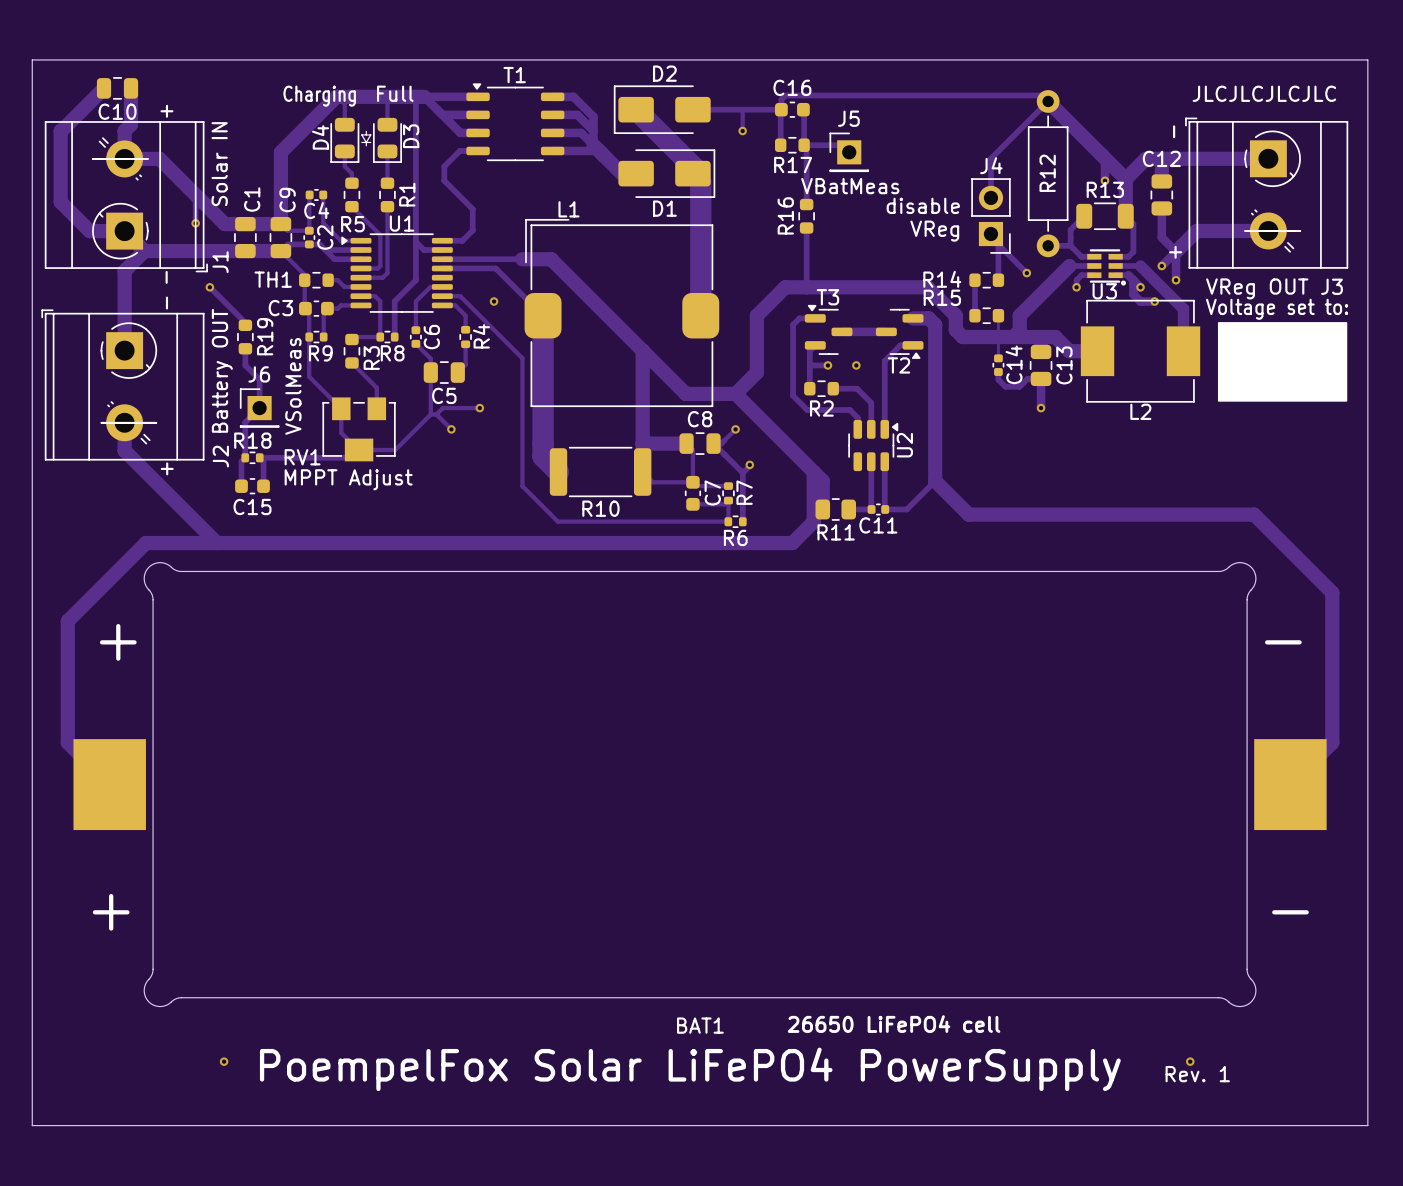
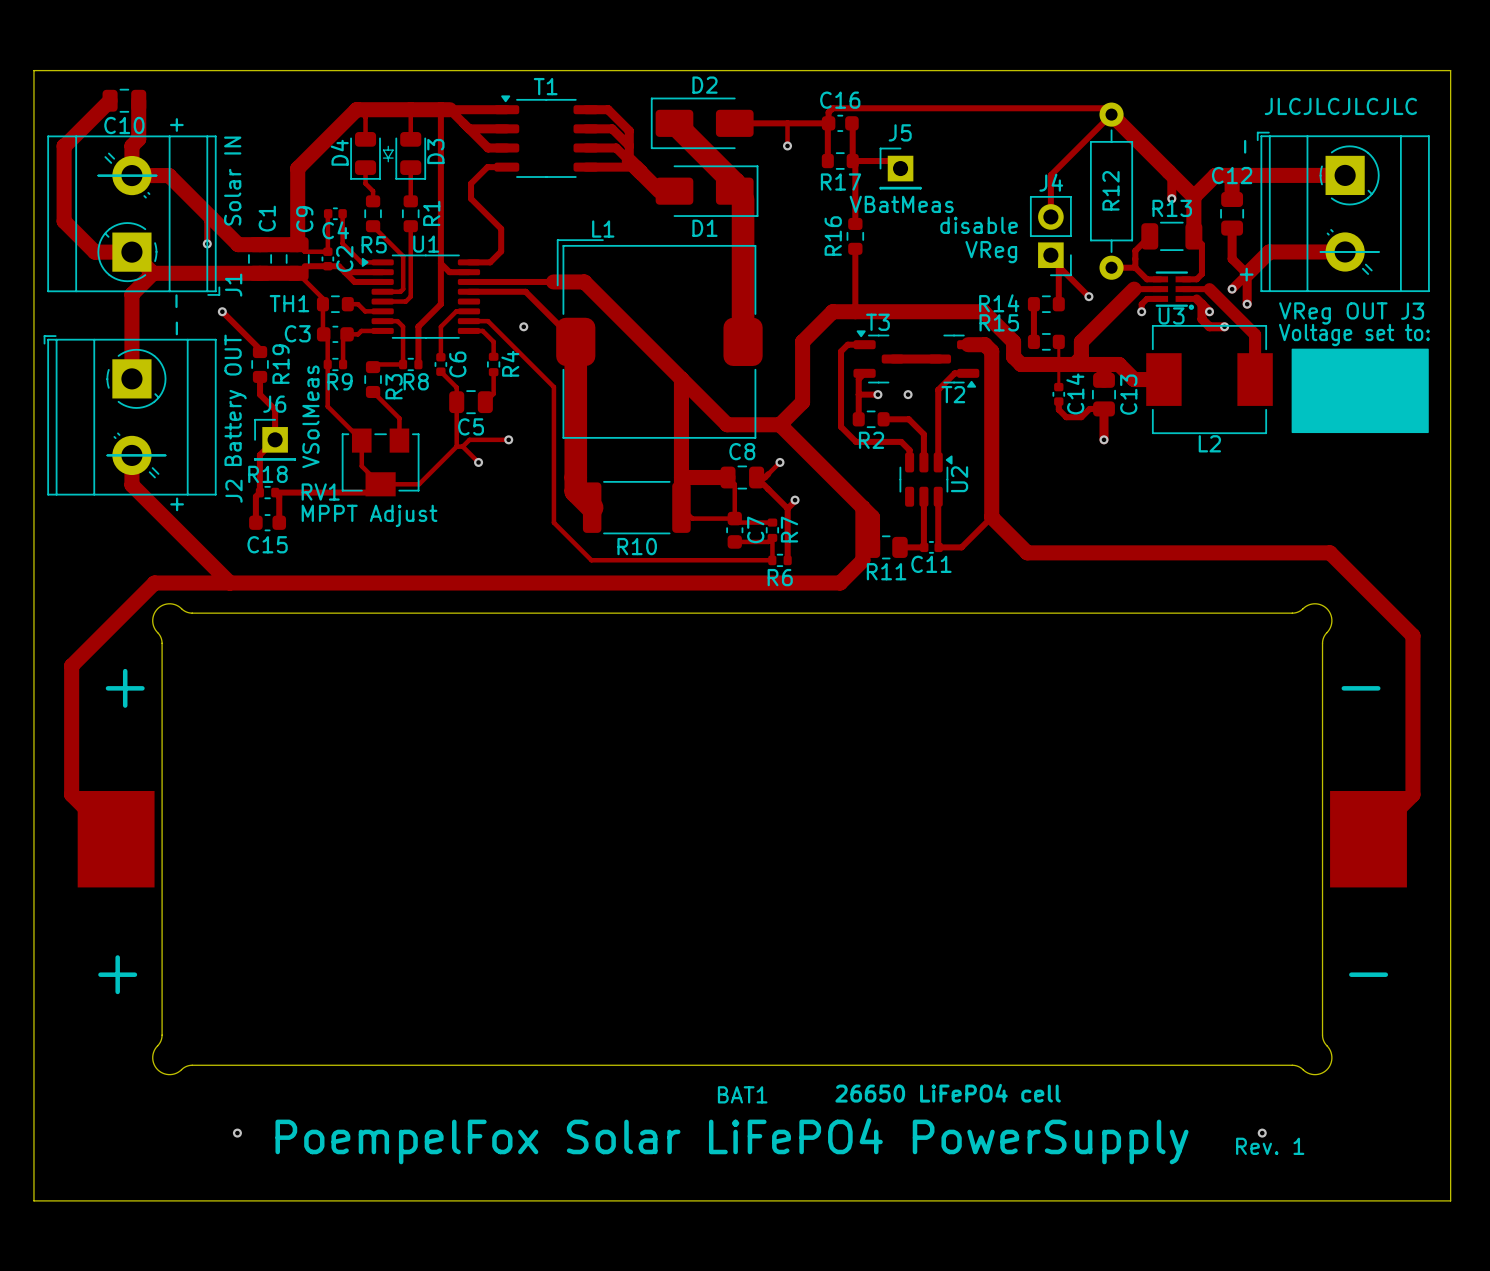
text: Full (395, 93) -> none
text: Charging (319, 96) -> none

